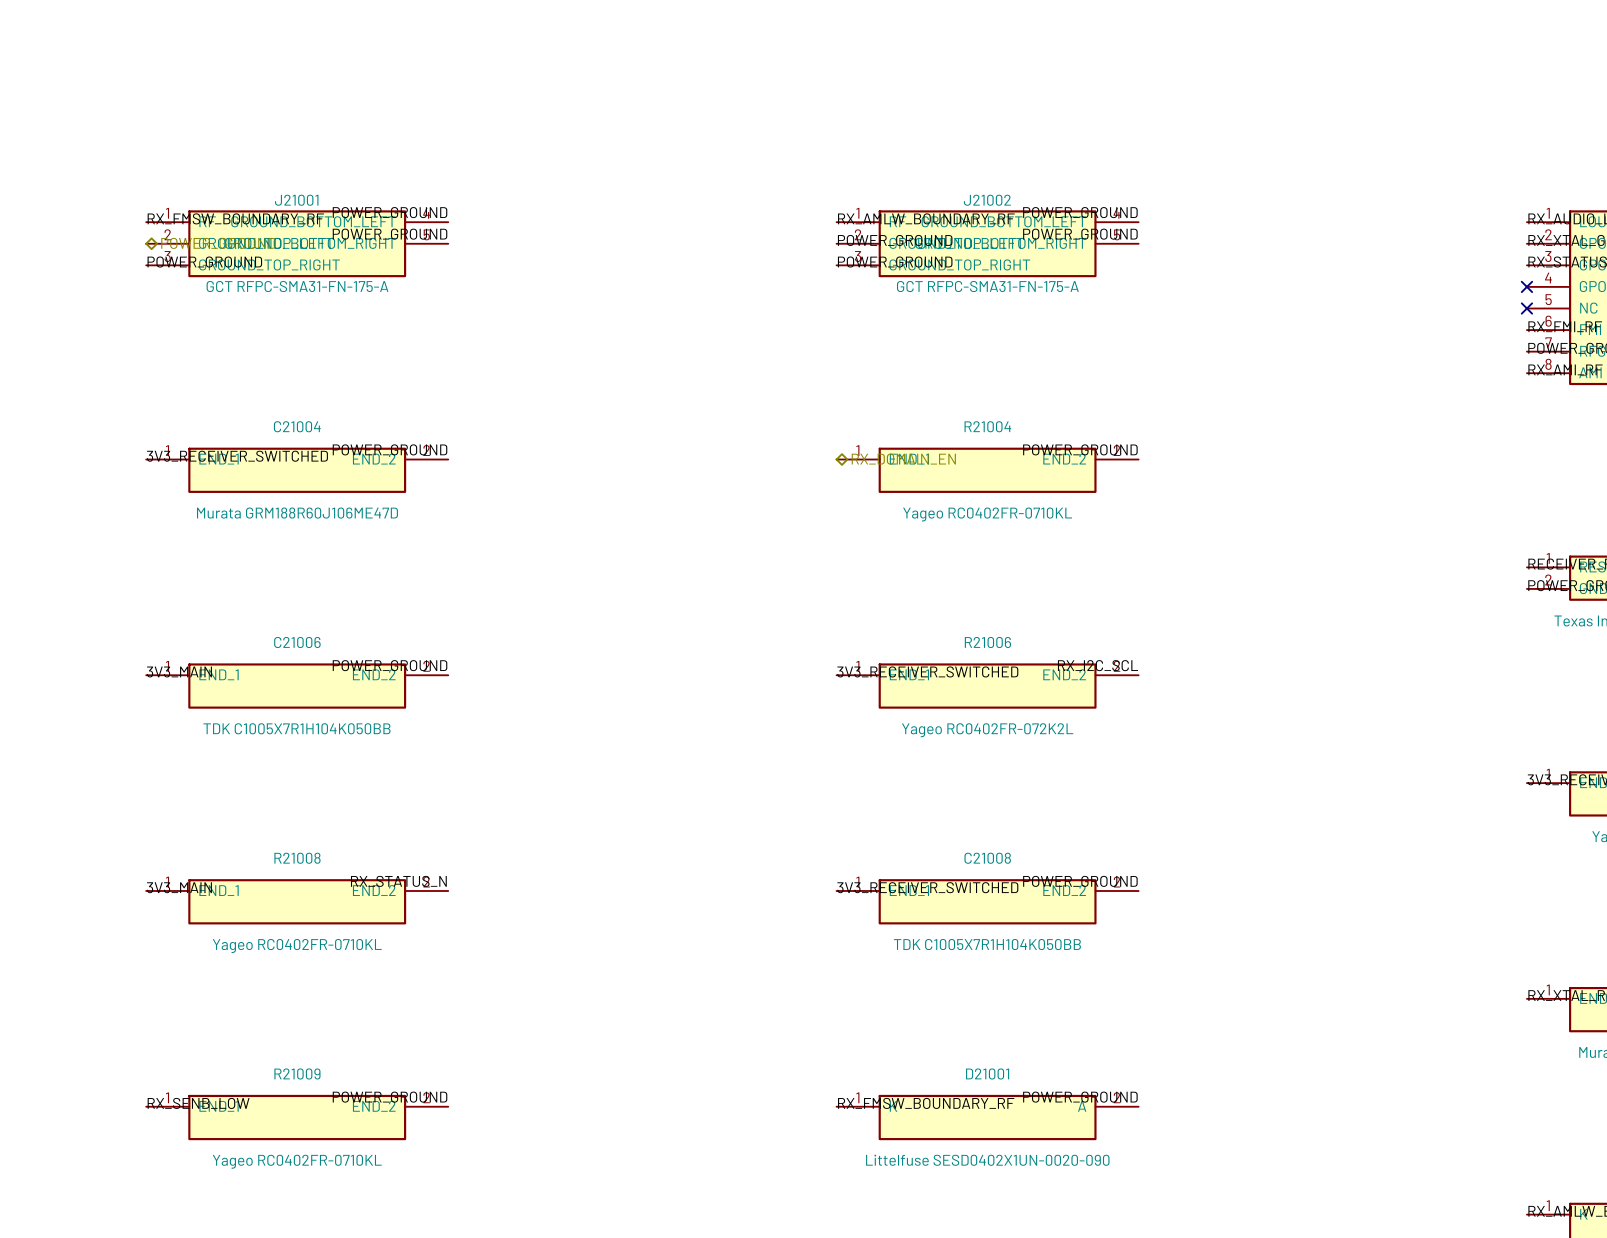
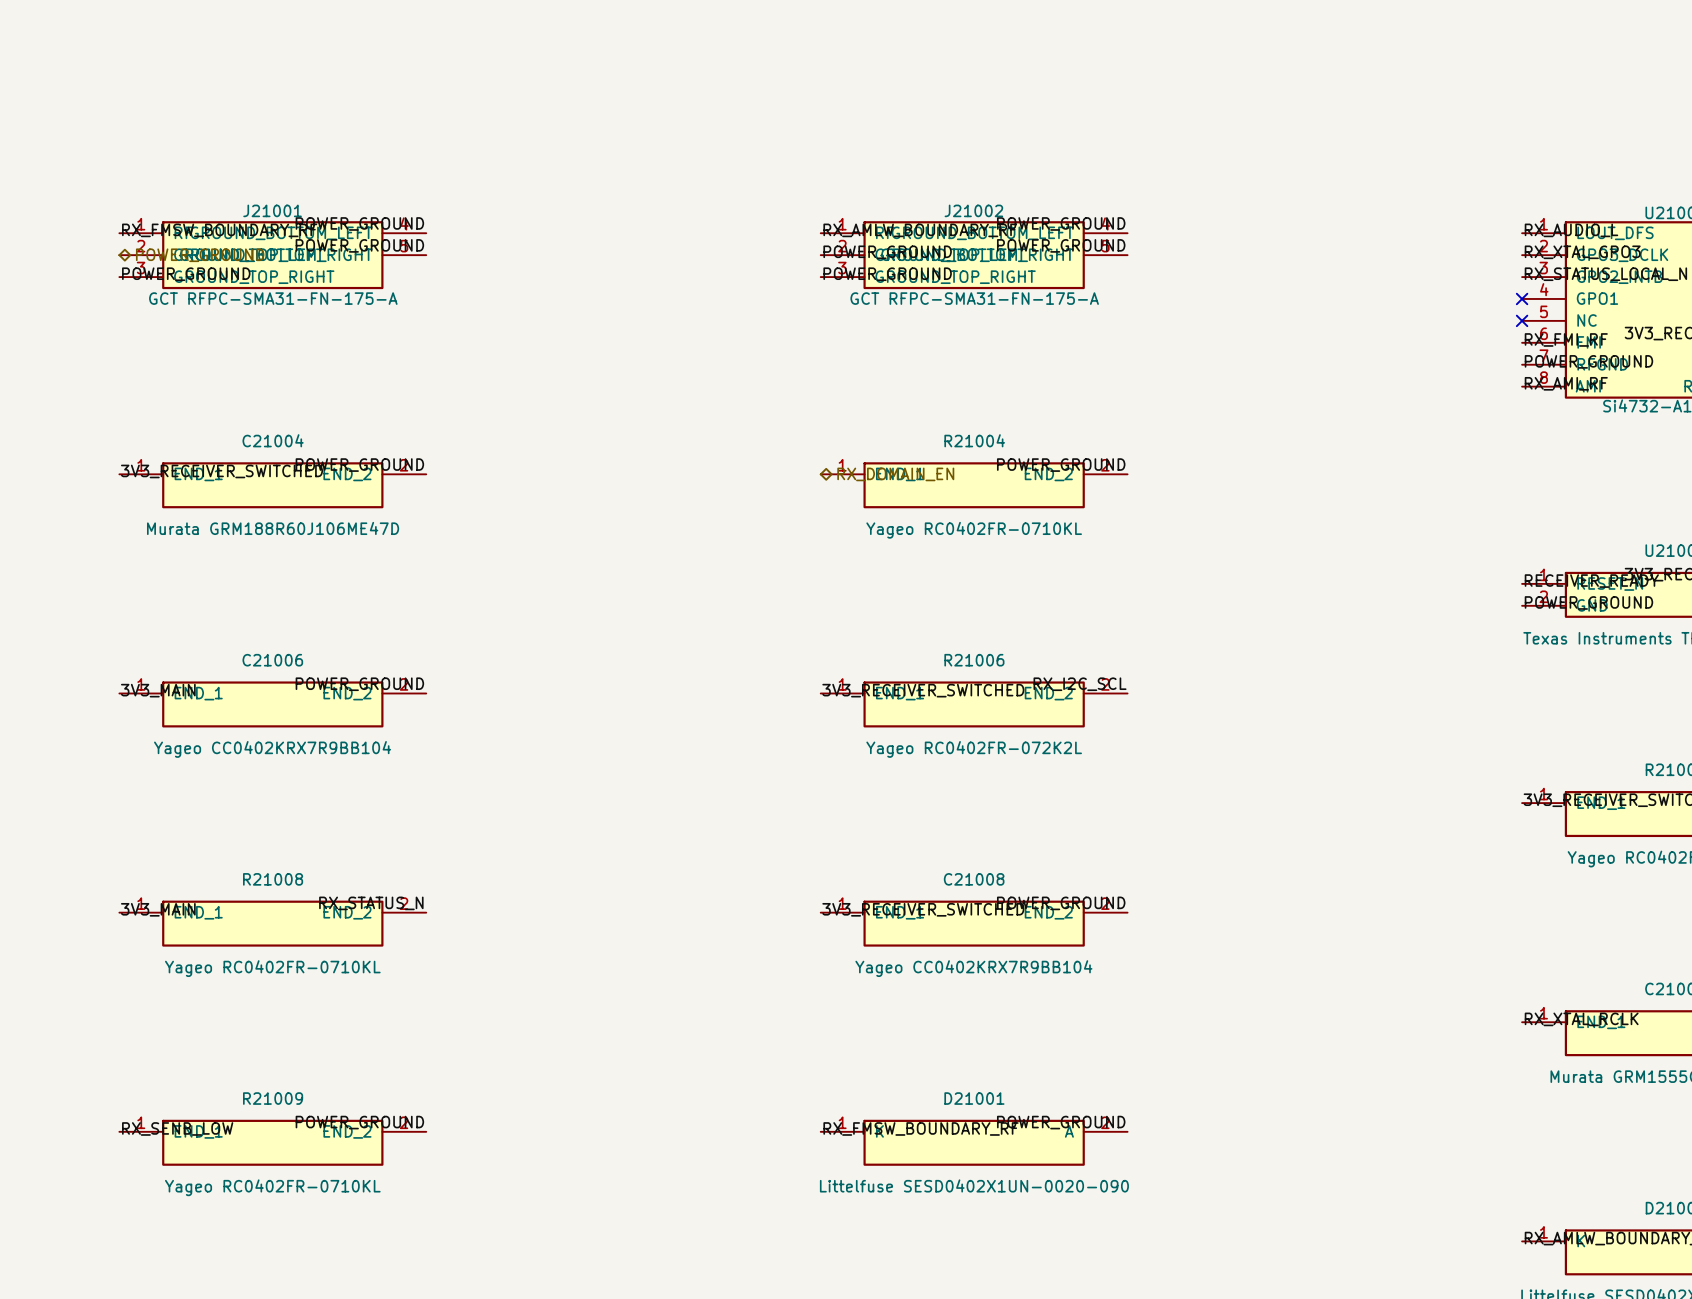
C21006 value: TDK C1005X7R1H104K050BB (296, 728) -> Yageo CC0402KRX7R9BB104 (272, 749)
C21008 value: TDK C1005X7R1H104K050BB (987, 944) -> Yageo CC0402KRX7R9BB104 (973, 968)

